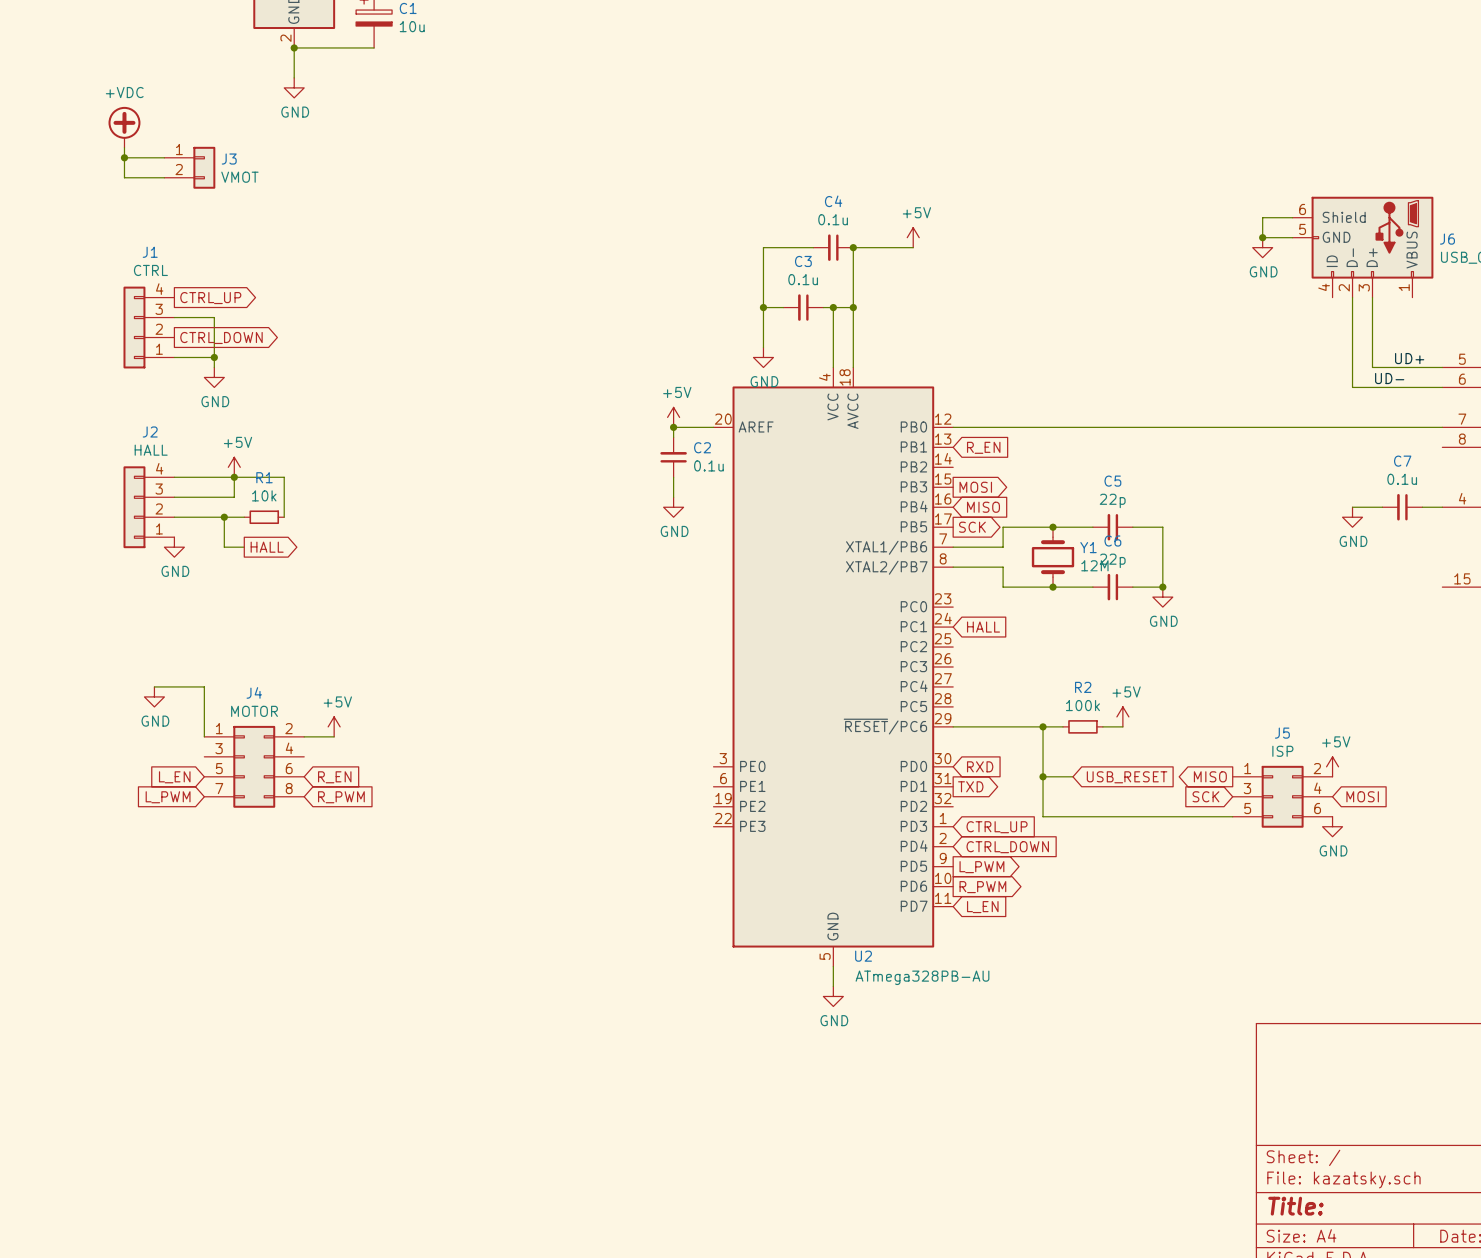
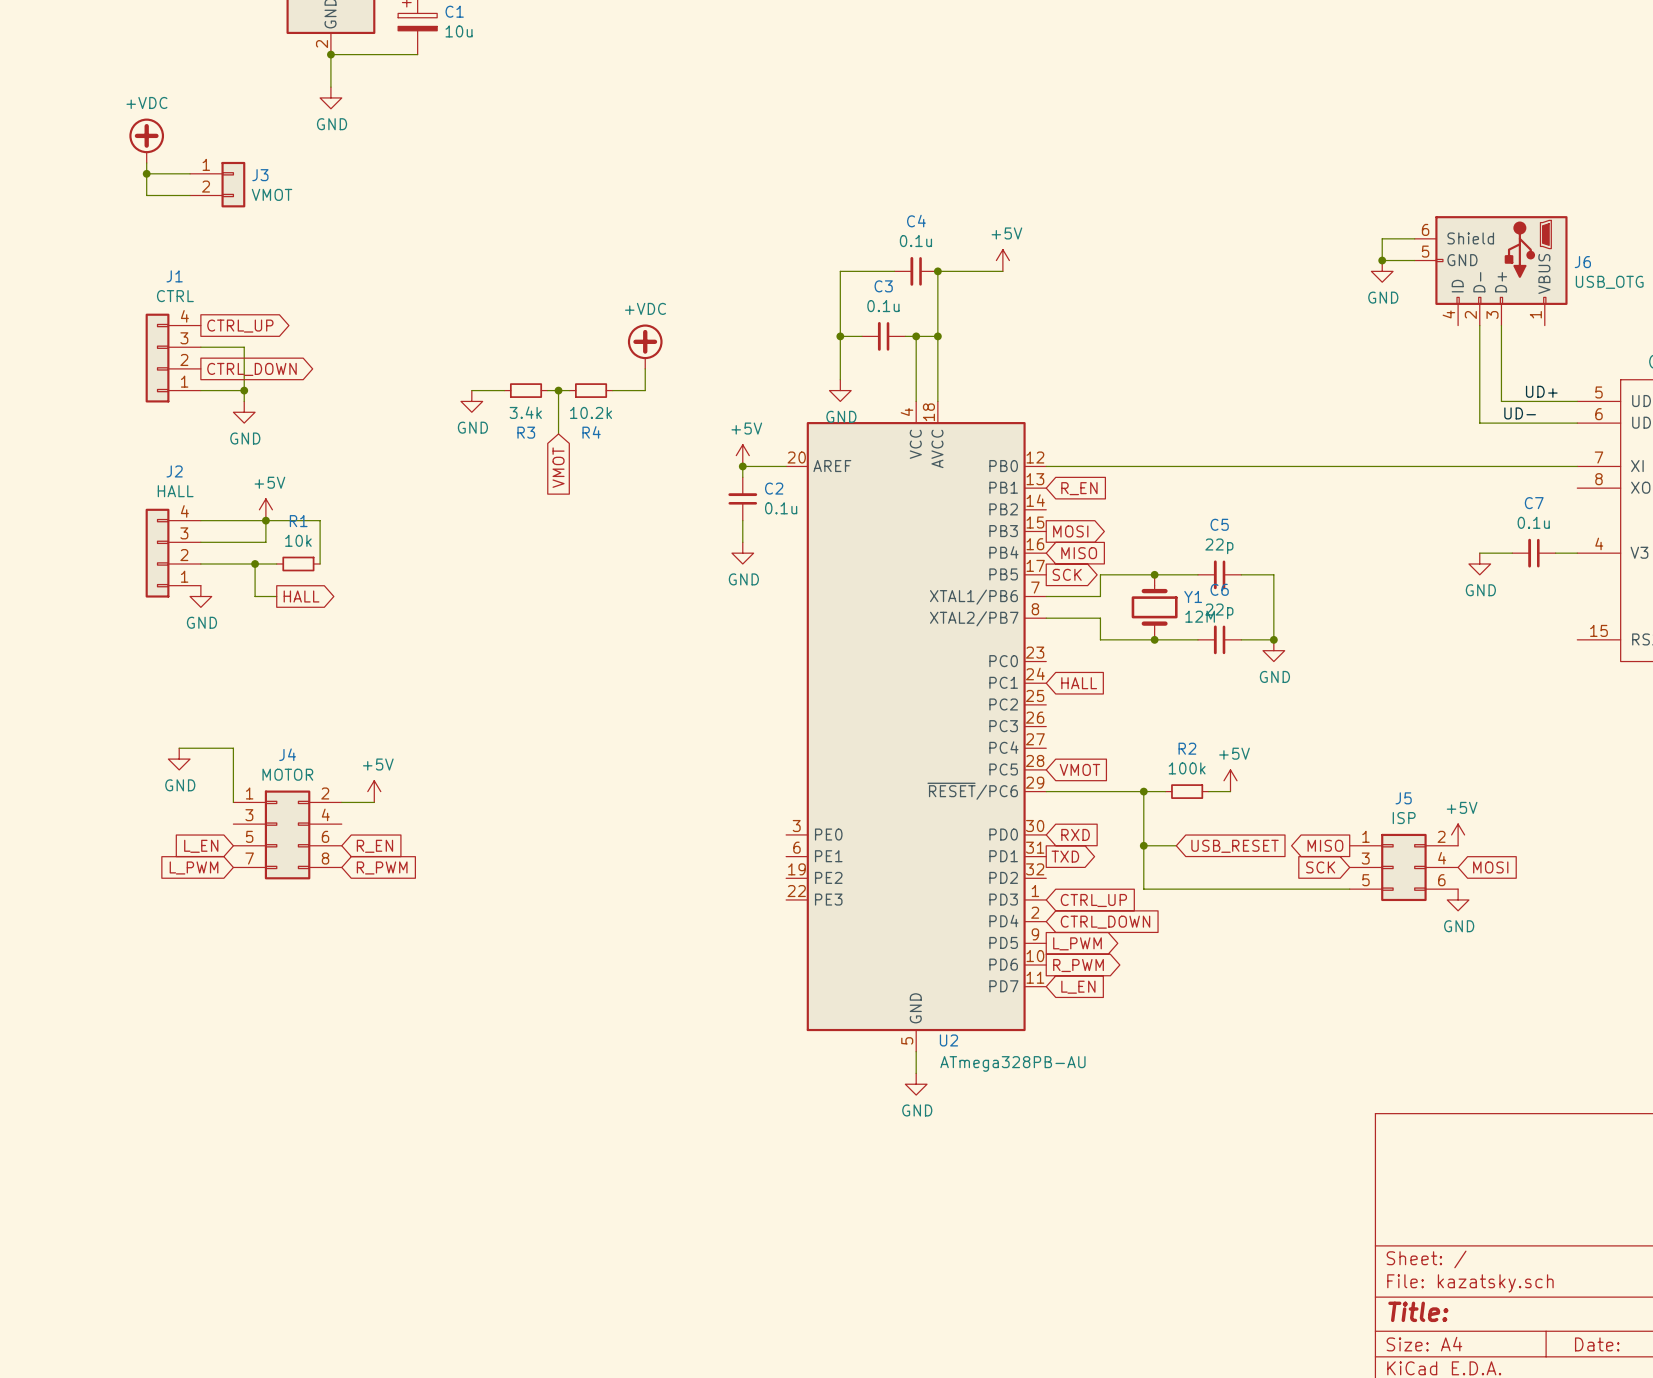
power symbol: none -> +VDC (645, 346)
wire: none -> (645, 368) (645, 390) (612, 390)
wire: none -> (471, 390) (504, 390)
R3: none -> 3.4k (526, 390)
wire: none -> (547, 390) (569, 390)
wire: none -> (558, 390) (558, 433)
junction: none -> (558, 390)
R4: none -> 10.2k (591, 390)
power symbol: none -> GND (471, 401)
global label: none -> VMOT (558, 467)
global label: none -> VMOT (1079, 769)

